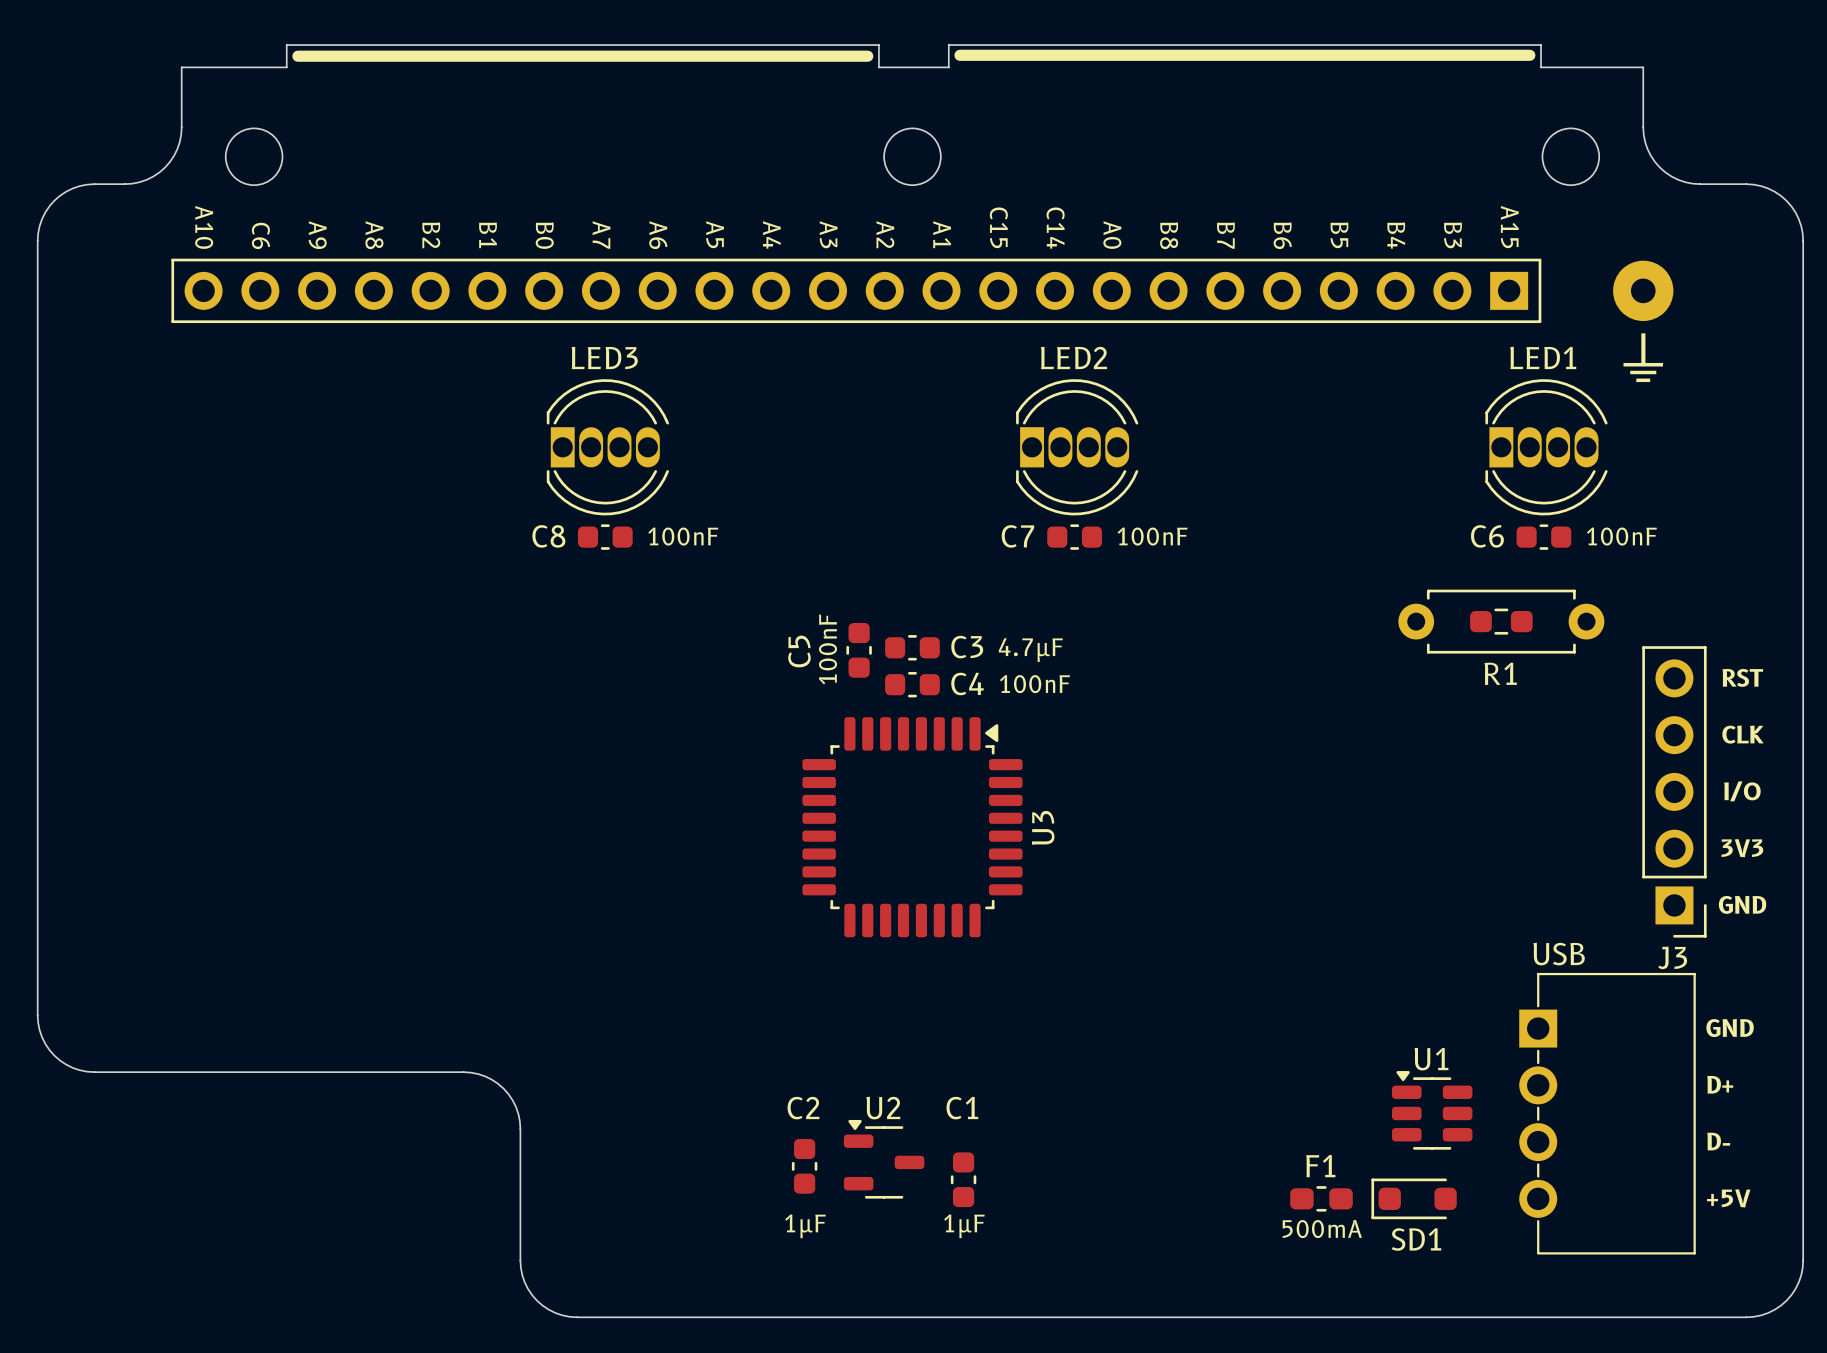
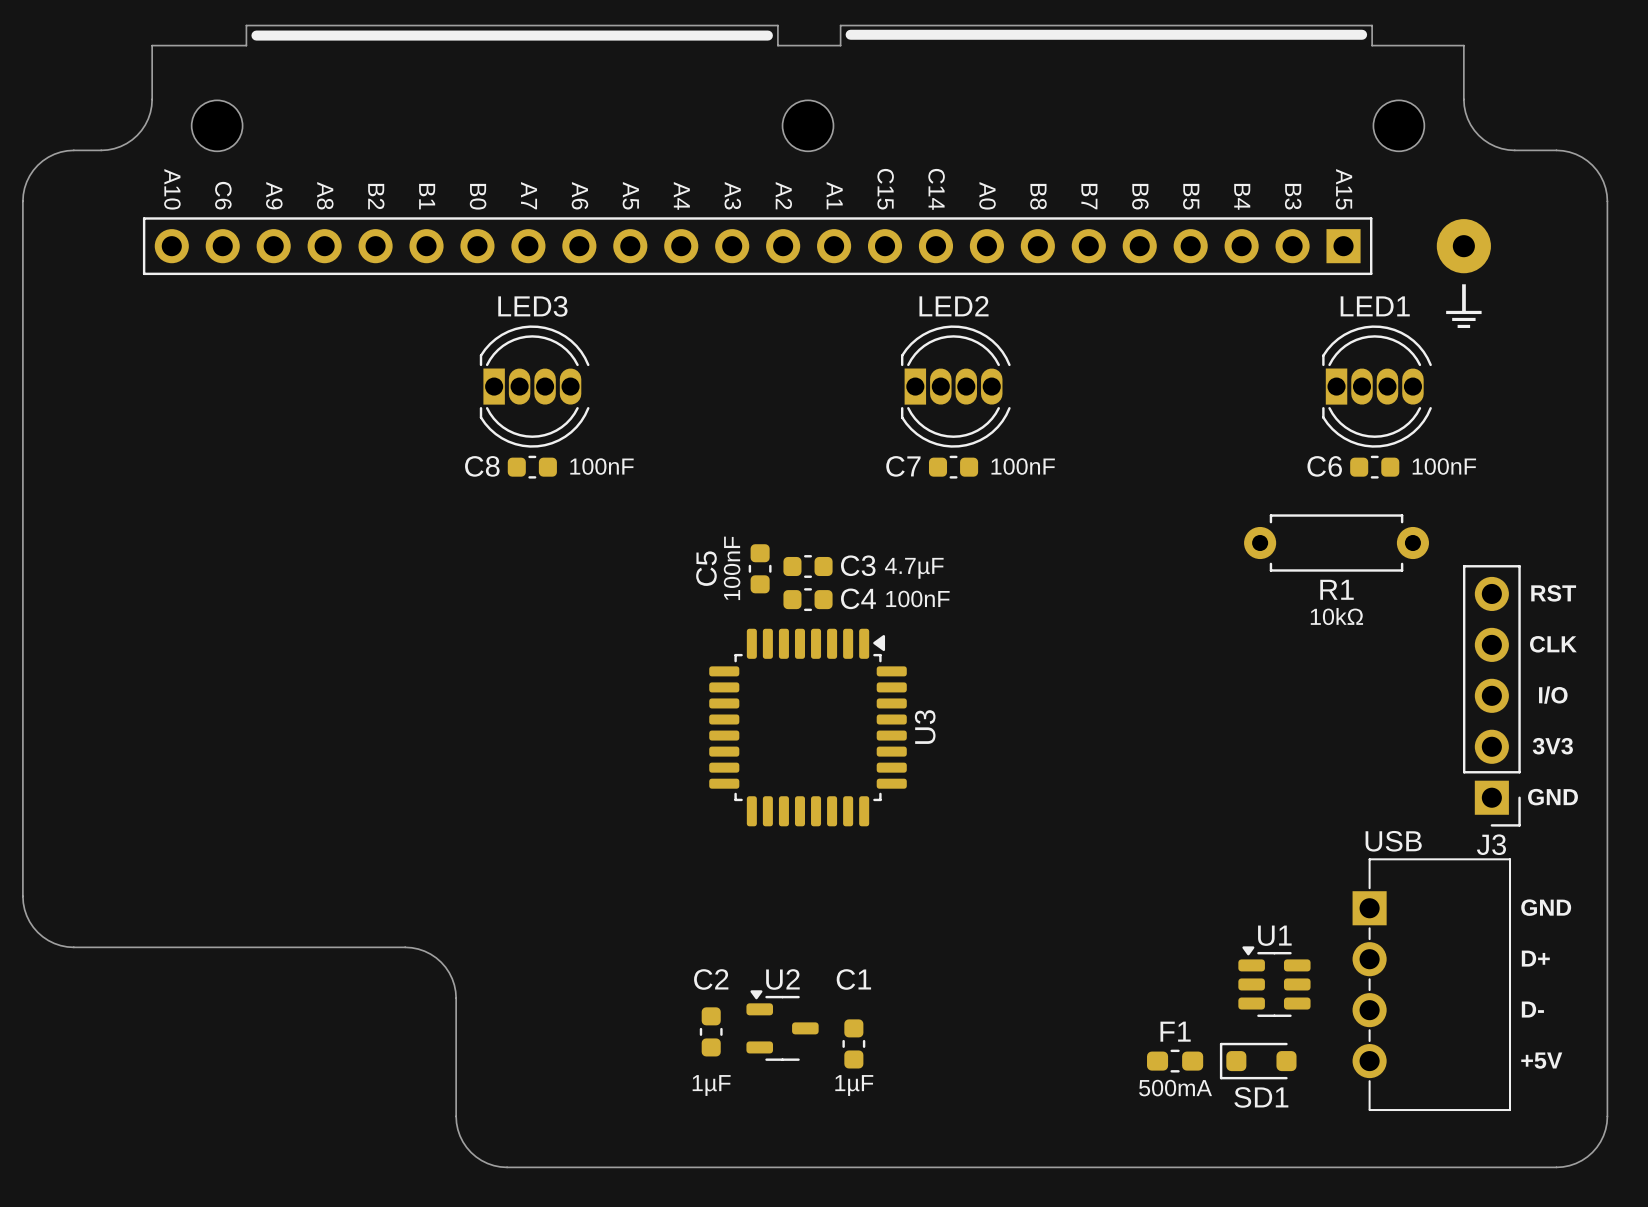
R1 footprint: [1398, 589, 1605, 654] -> [1244, 514, 1429, 572]
R1 value: none -> 10kΩ (1336, 616)

